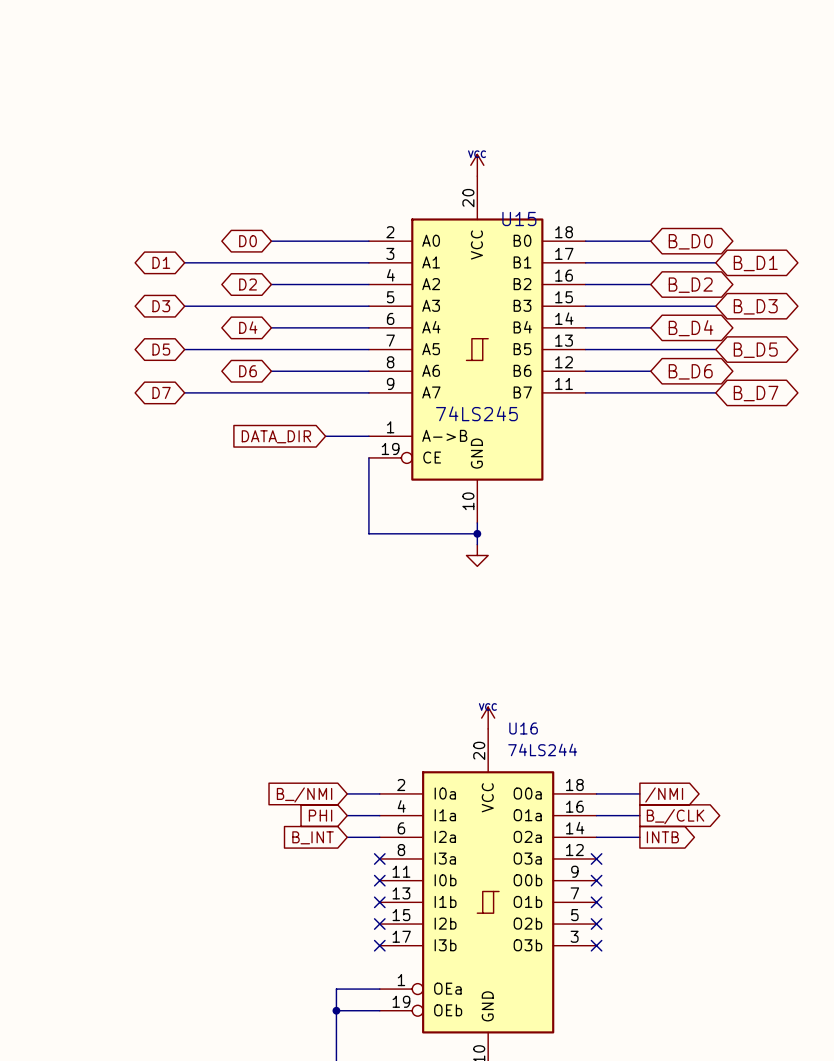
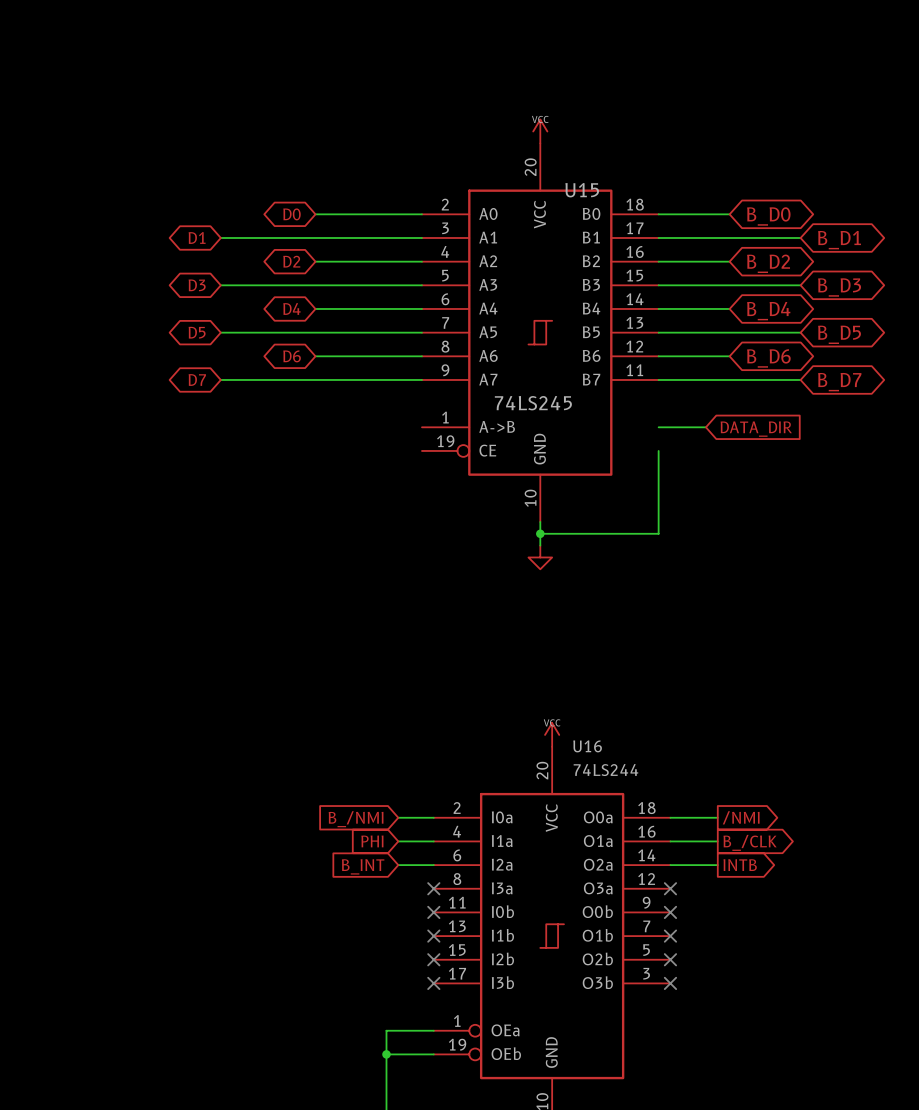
global label: DATA_DIR (276, 436) -> none
wire: (325, 436) (368, 436) -> none
wire: none -> (658, 427) (705, 427)
global label: none -> DATA_DIR (756, 429)
wire: (368, 457) (368, 533) (477, 533) -> (658, 450) (658, 533) (540, 533)

